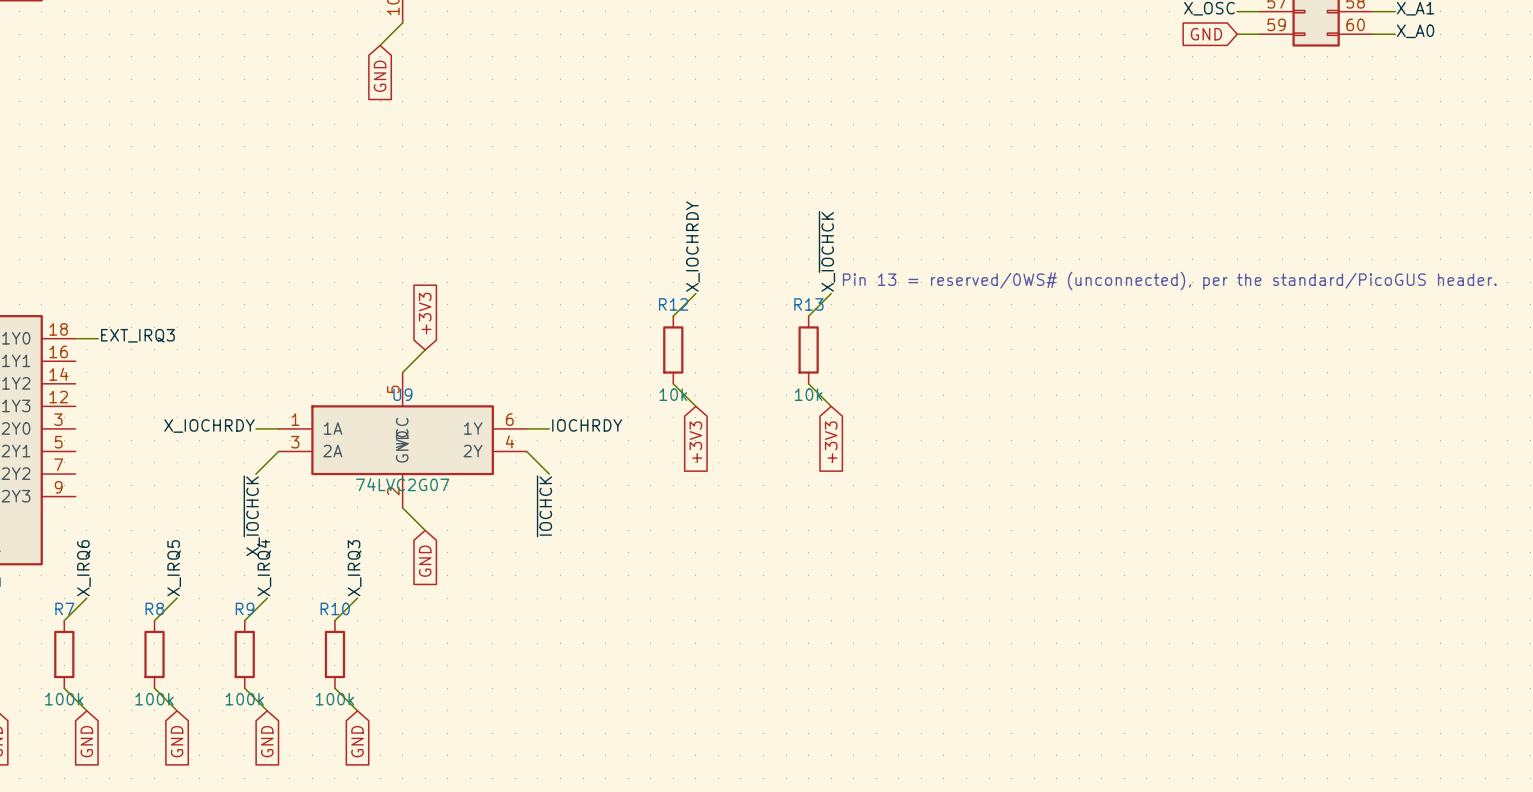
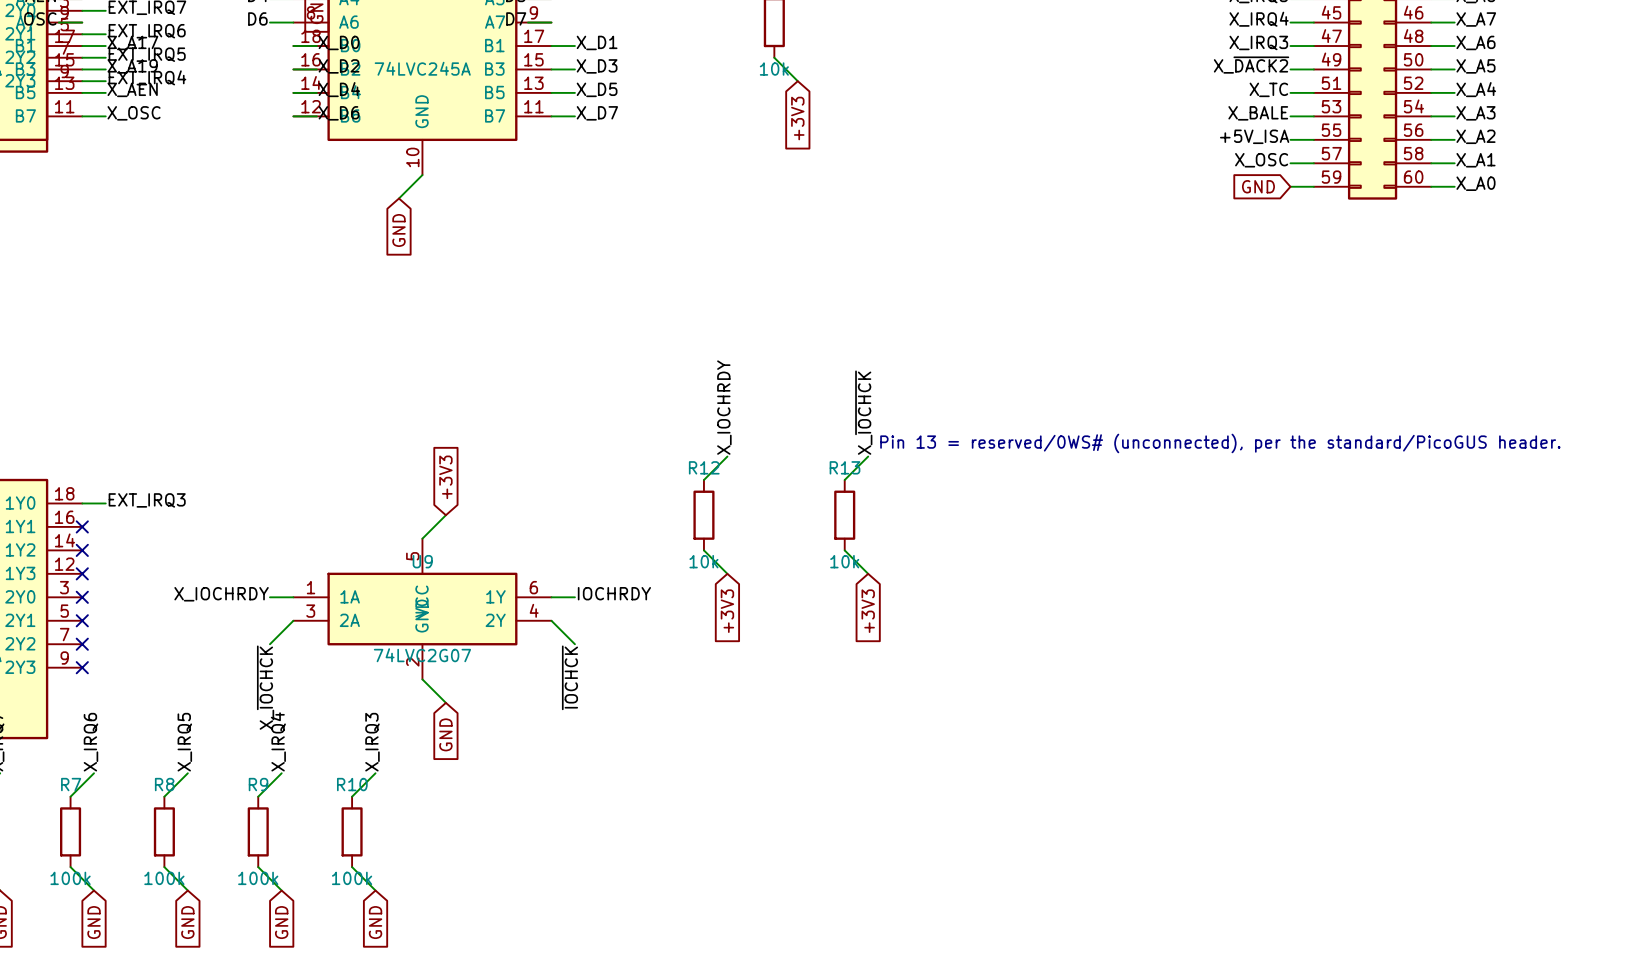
no-connect mark: none -> (82, 526)
no-connect mark: none -> (82, 550)
no-connect mark: none -> (82, 573)
no-connect mark: none -> (82, 597)
no-connect mark: none -> (82, 620)
no-connect mark: none -> (82, 644)
no-connect mark: none -> (82, 667)

